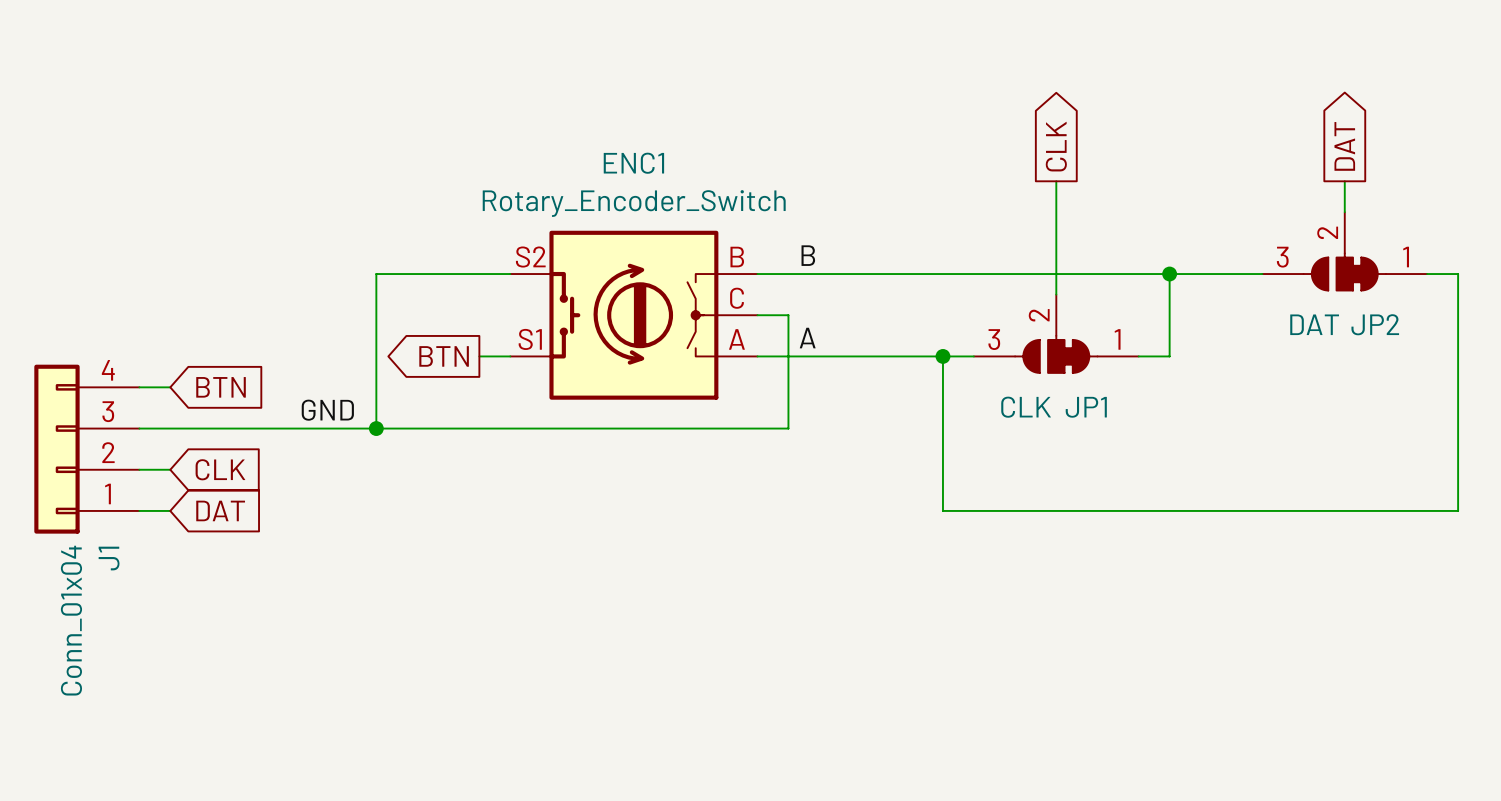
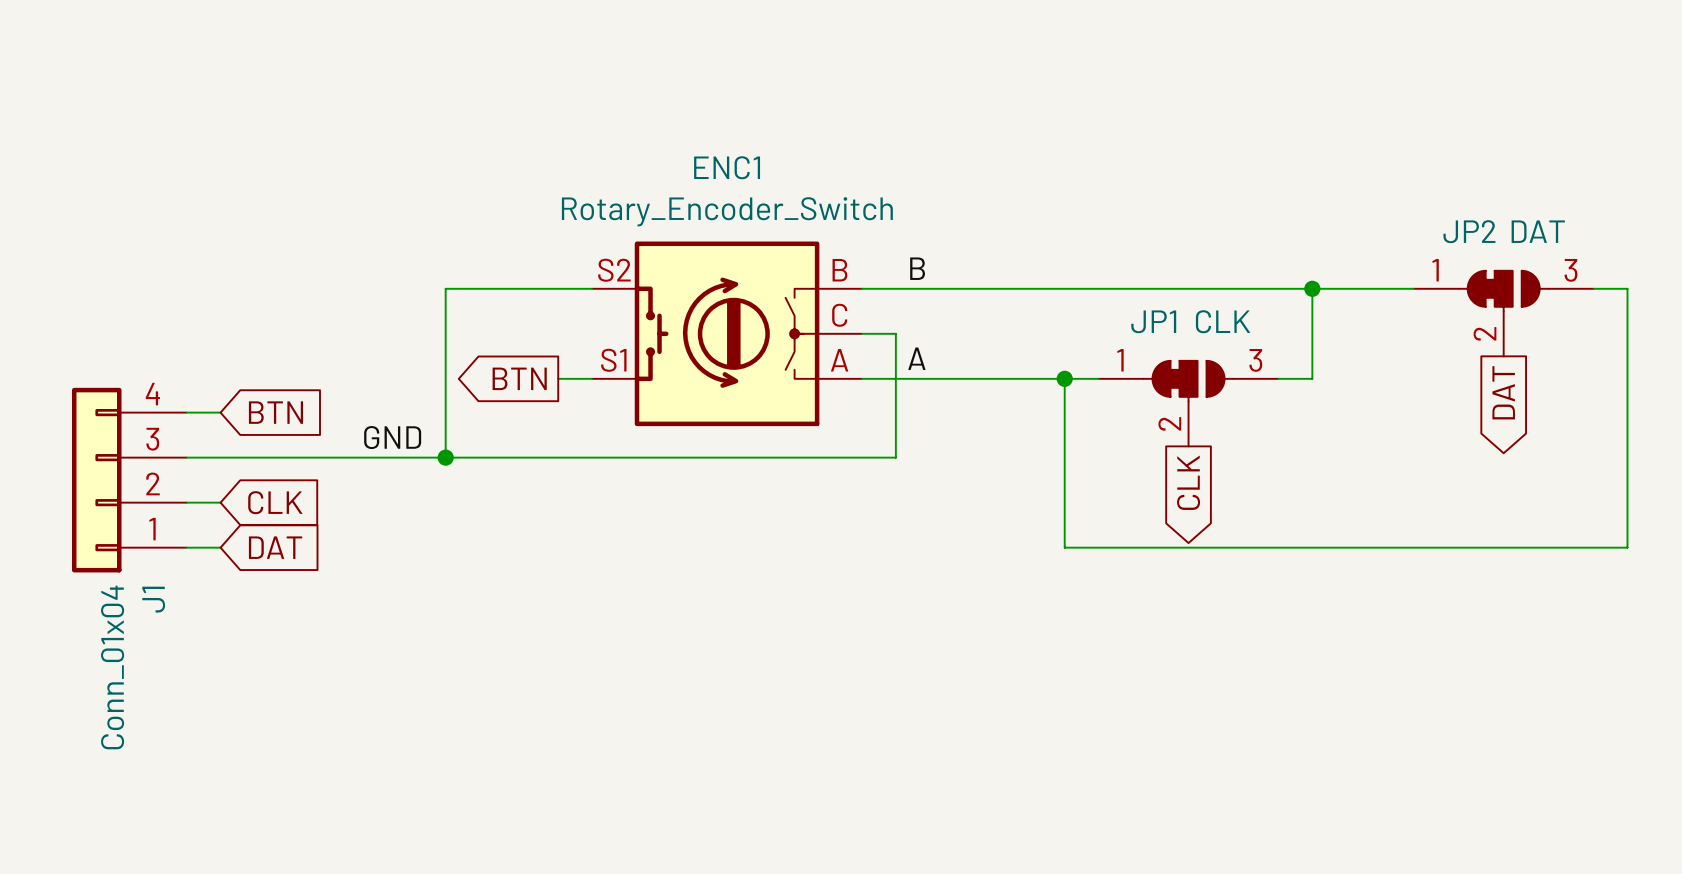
global label rotation: 0° (1056, 146) -> 180° (1188, 482)
global label position: CLK (1056, 146) -> CLK (1188, 482)
global label rotation: 0° (1344, 146) -> 180° (1503, 392)
global label position: DAT (1344, 146) -> DAT (1503, 392)
wire: (1056, 181) (1056, 294) -> none
wire: (1344, 181) (1344, 212) -> none
JP2 rotation: 0° (1344, 271) -> 180° (1503, 291)
JP1 rotation: 0° (1056, 354) -> 180° (1188, 381)

